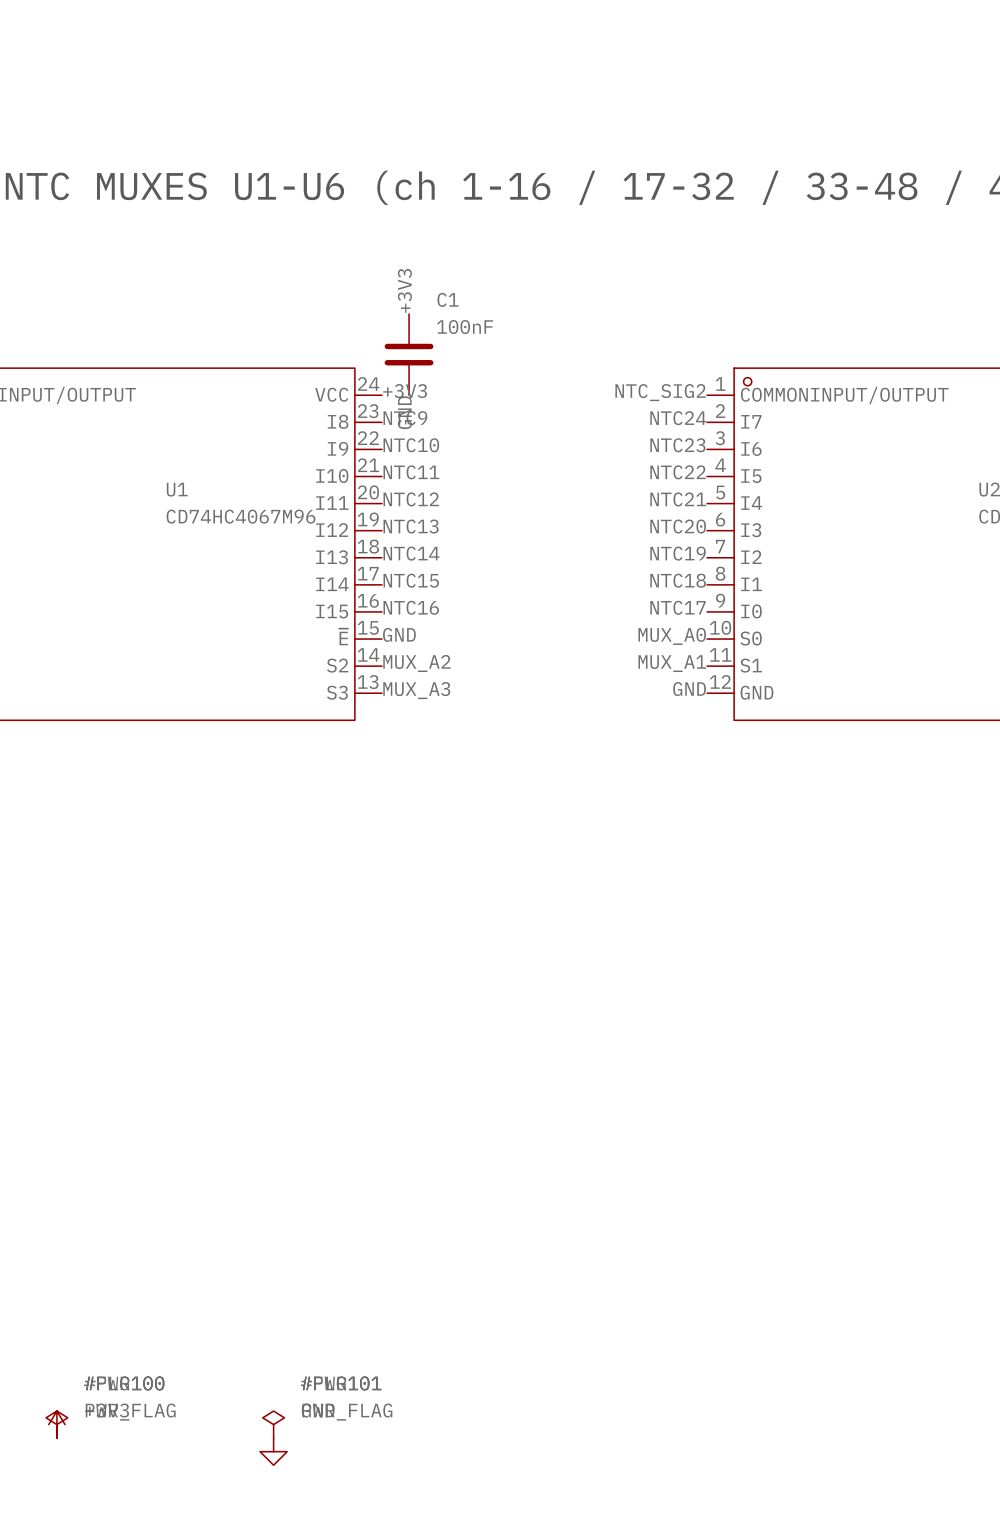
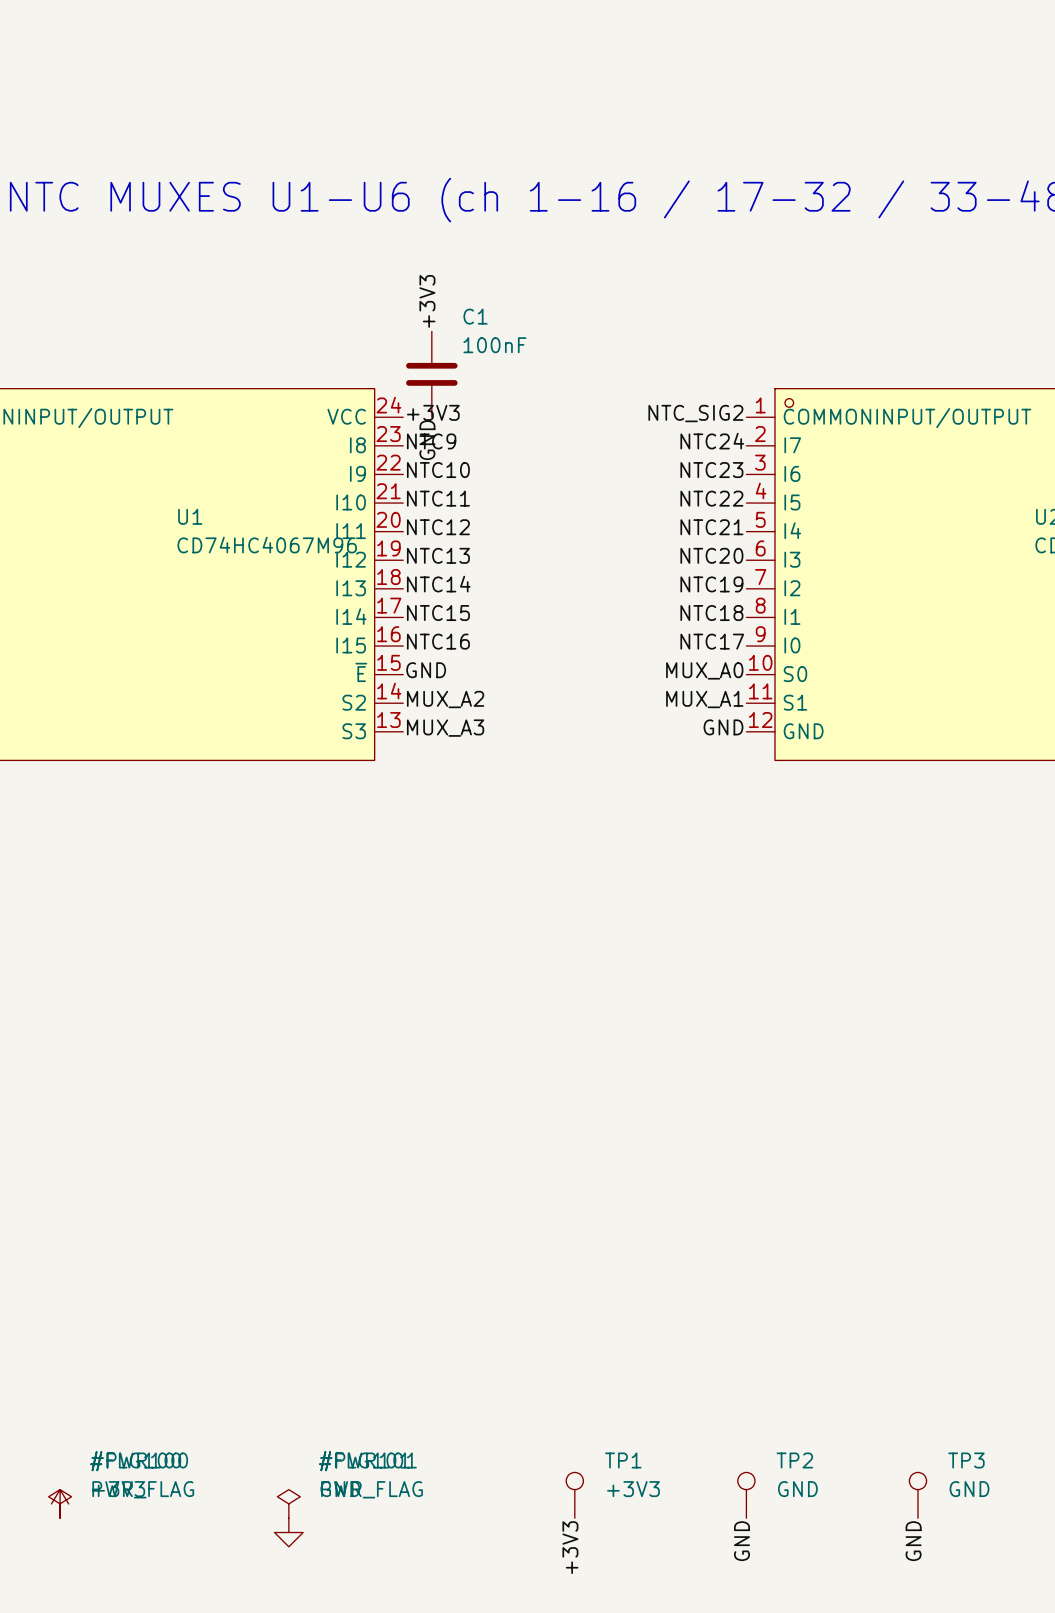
TP1: none -> +3V3 (574, 1495)
TP2: none -> GND (746, 1495)
TP3: none -> GND (917, 1495)
label: none -> GND (742, 1541)
label: none -> GND (913, 1541)
label: none -> +3V3 (570, 1547)

